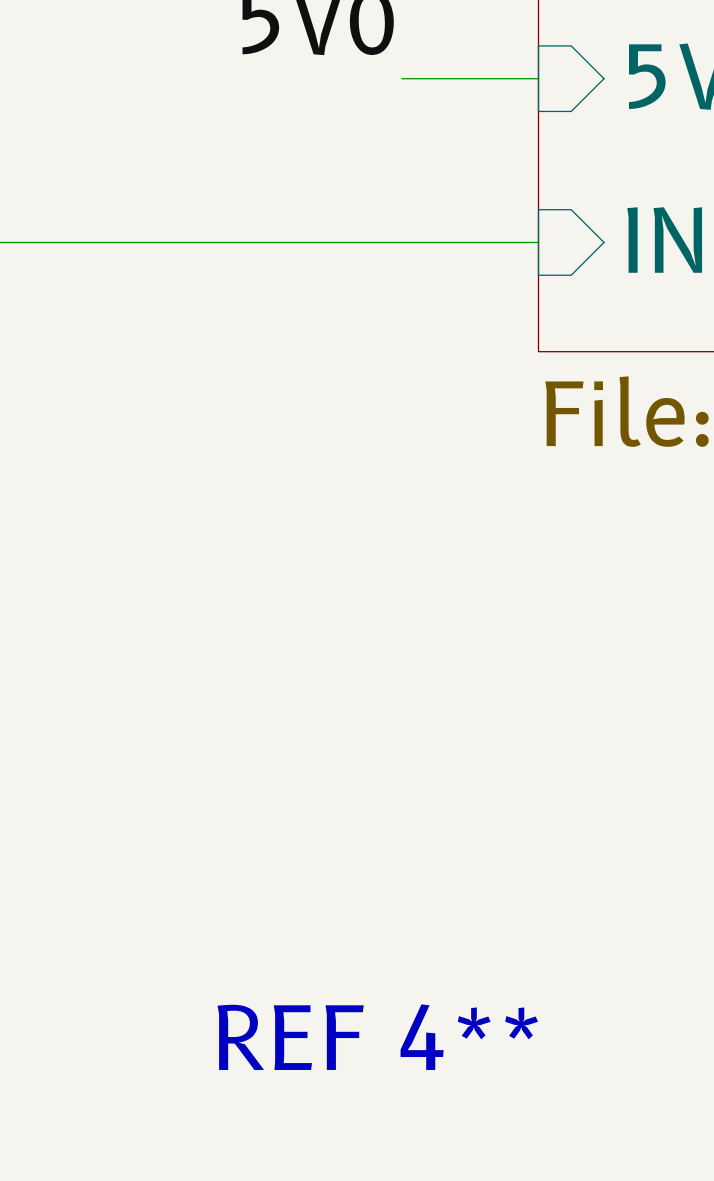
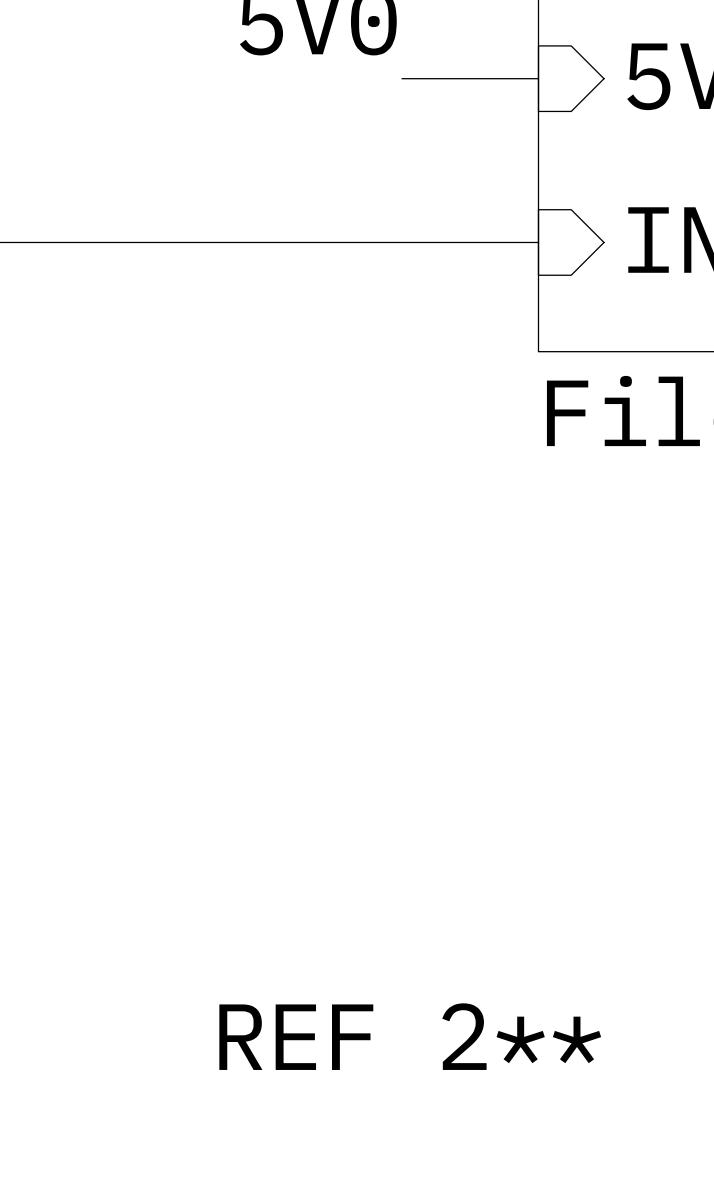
text: REF 4** (377, 1037) -> REF 2** (410, 1036)

